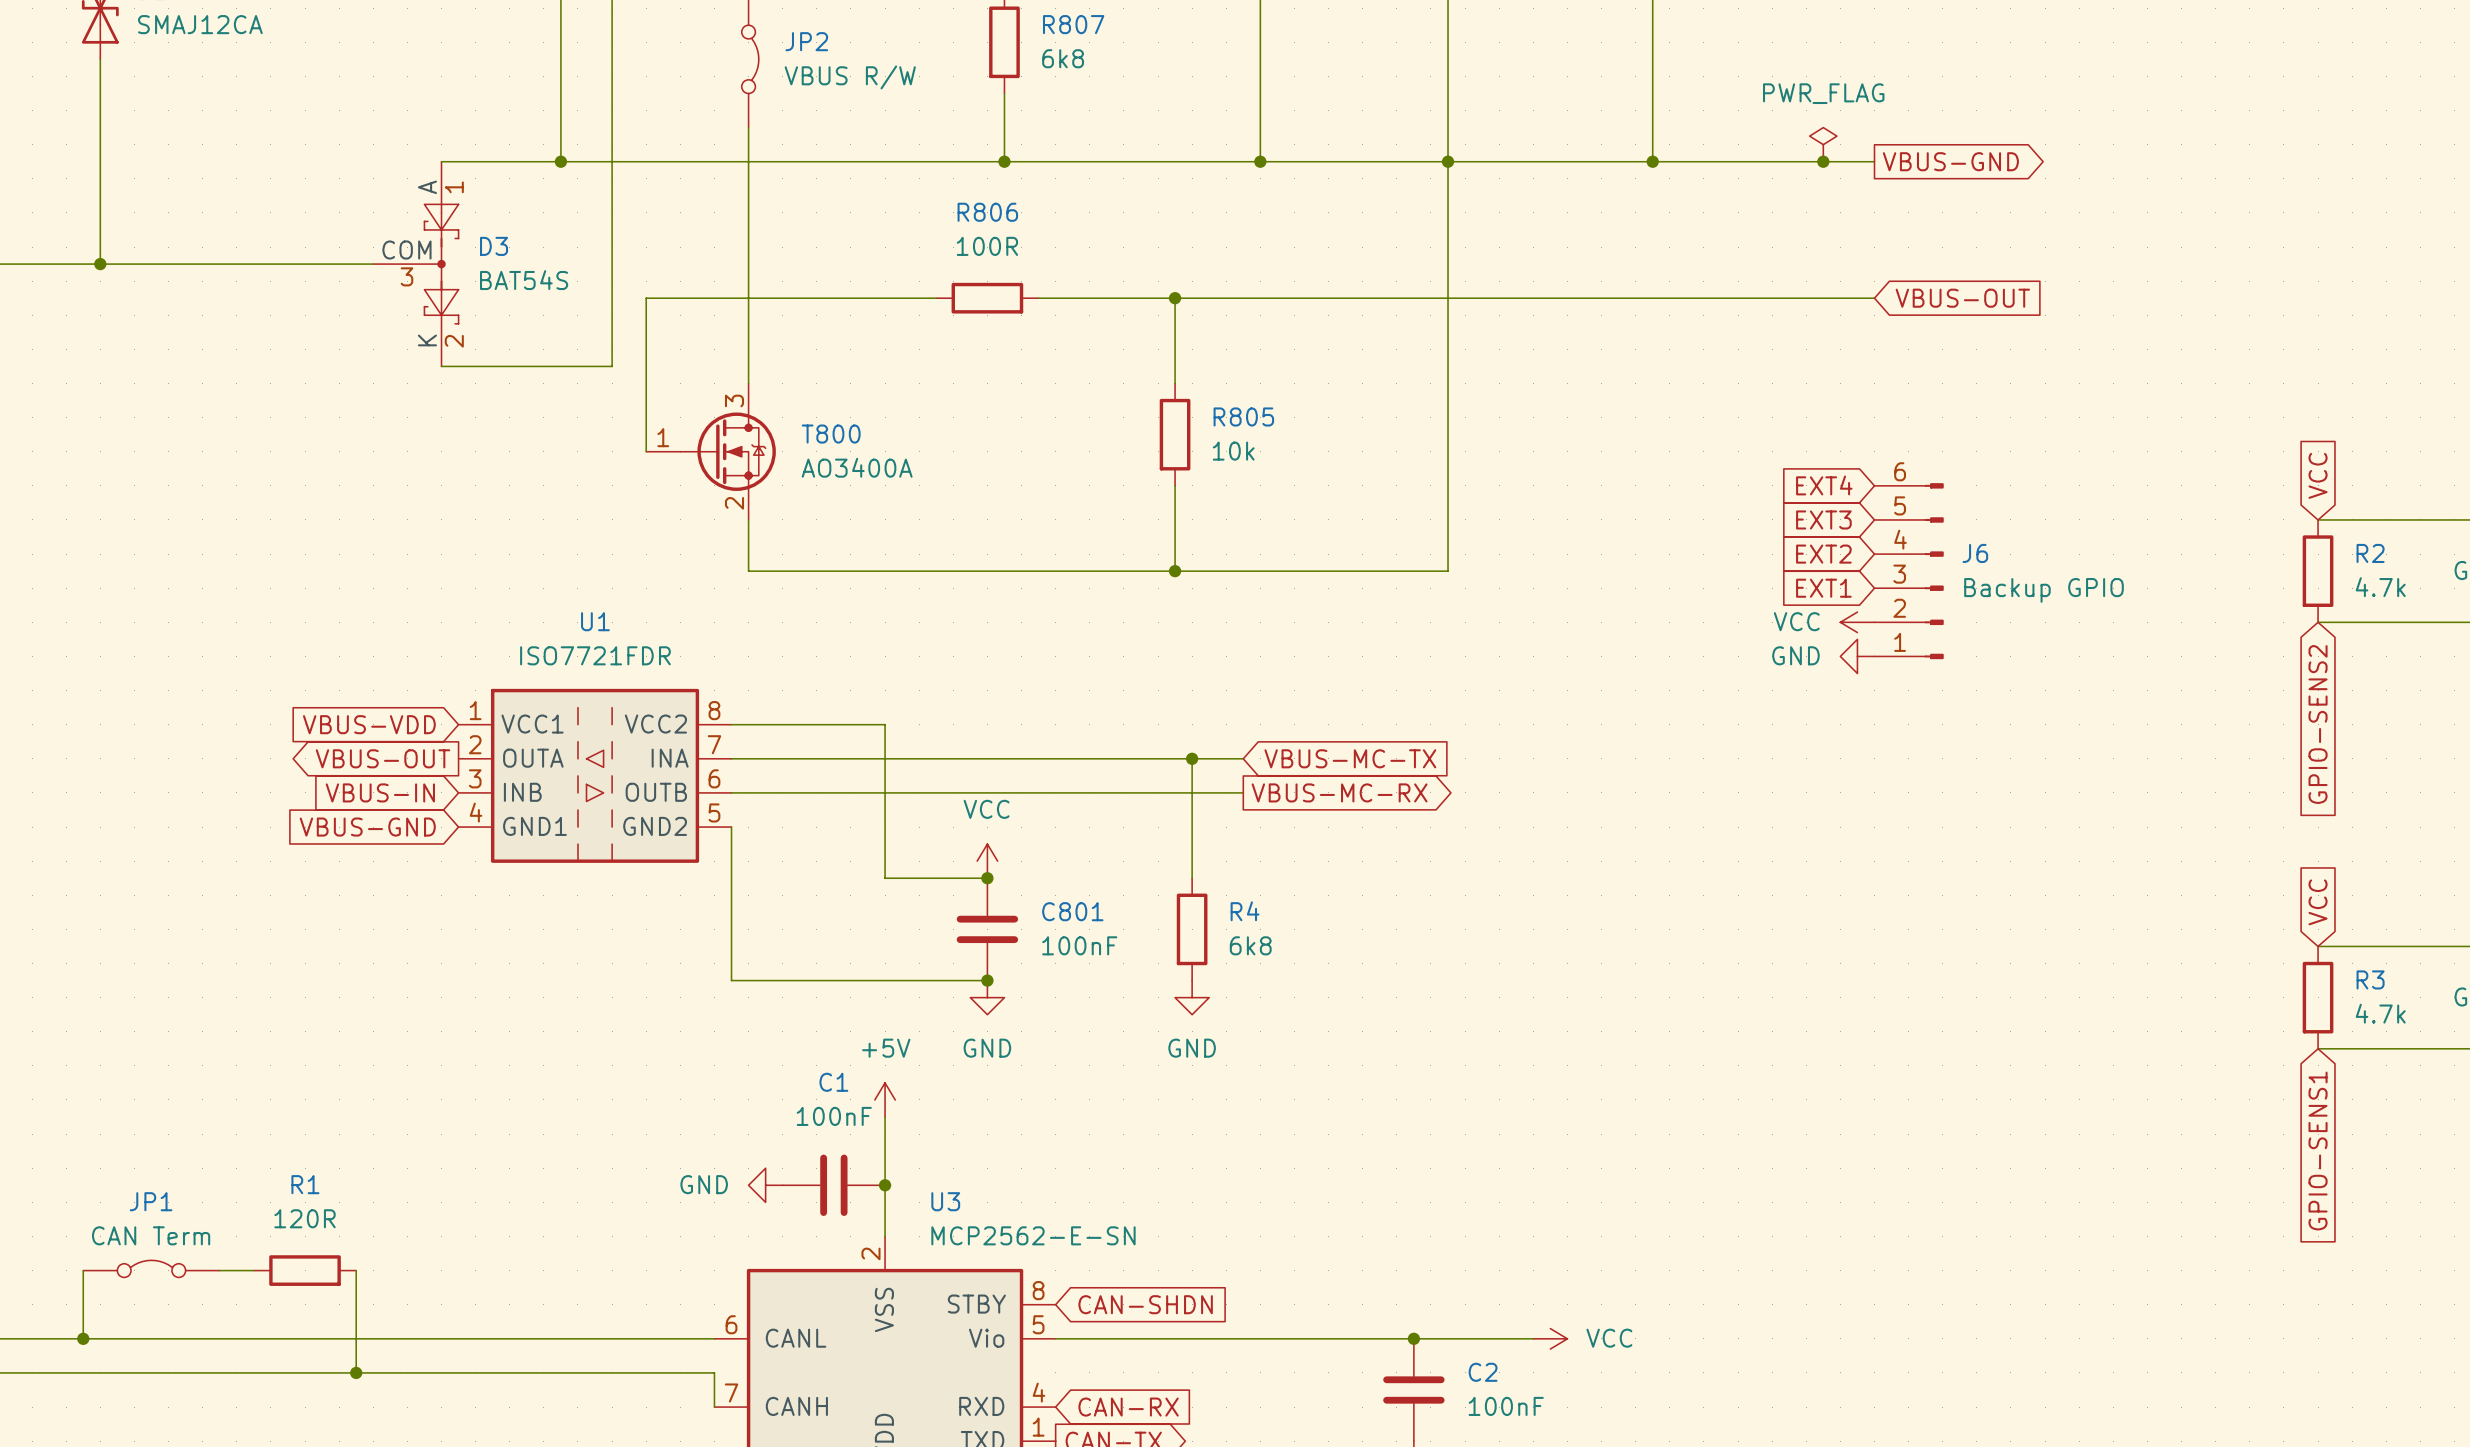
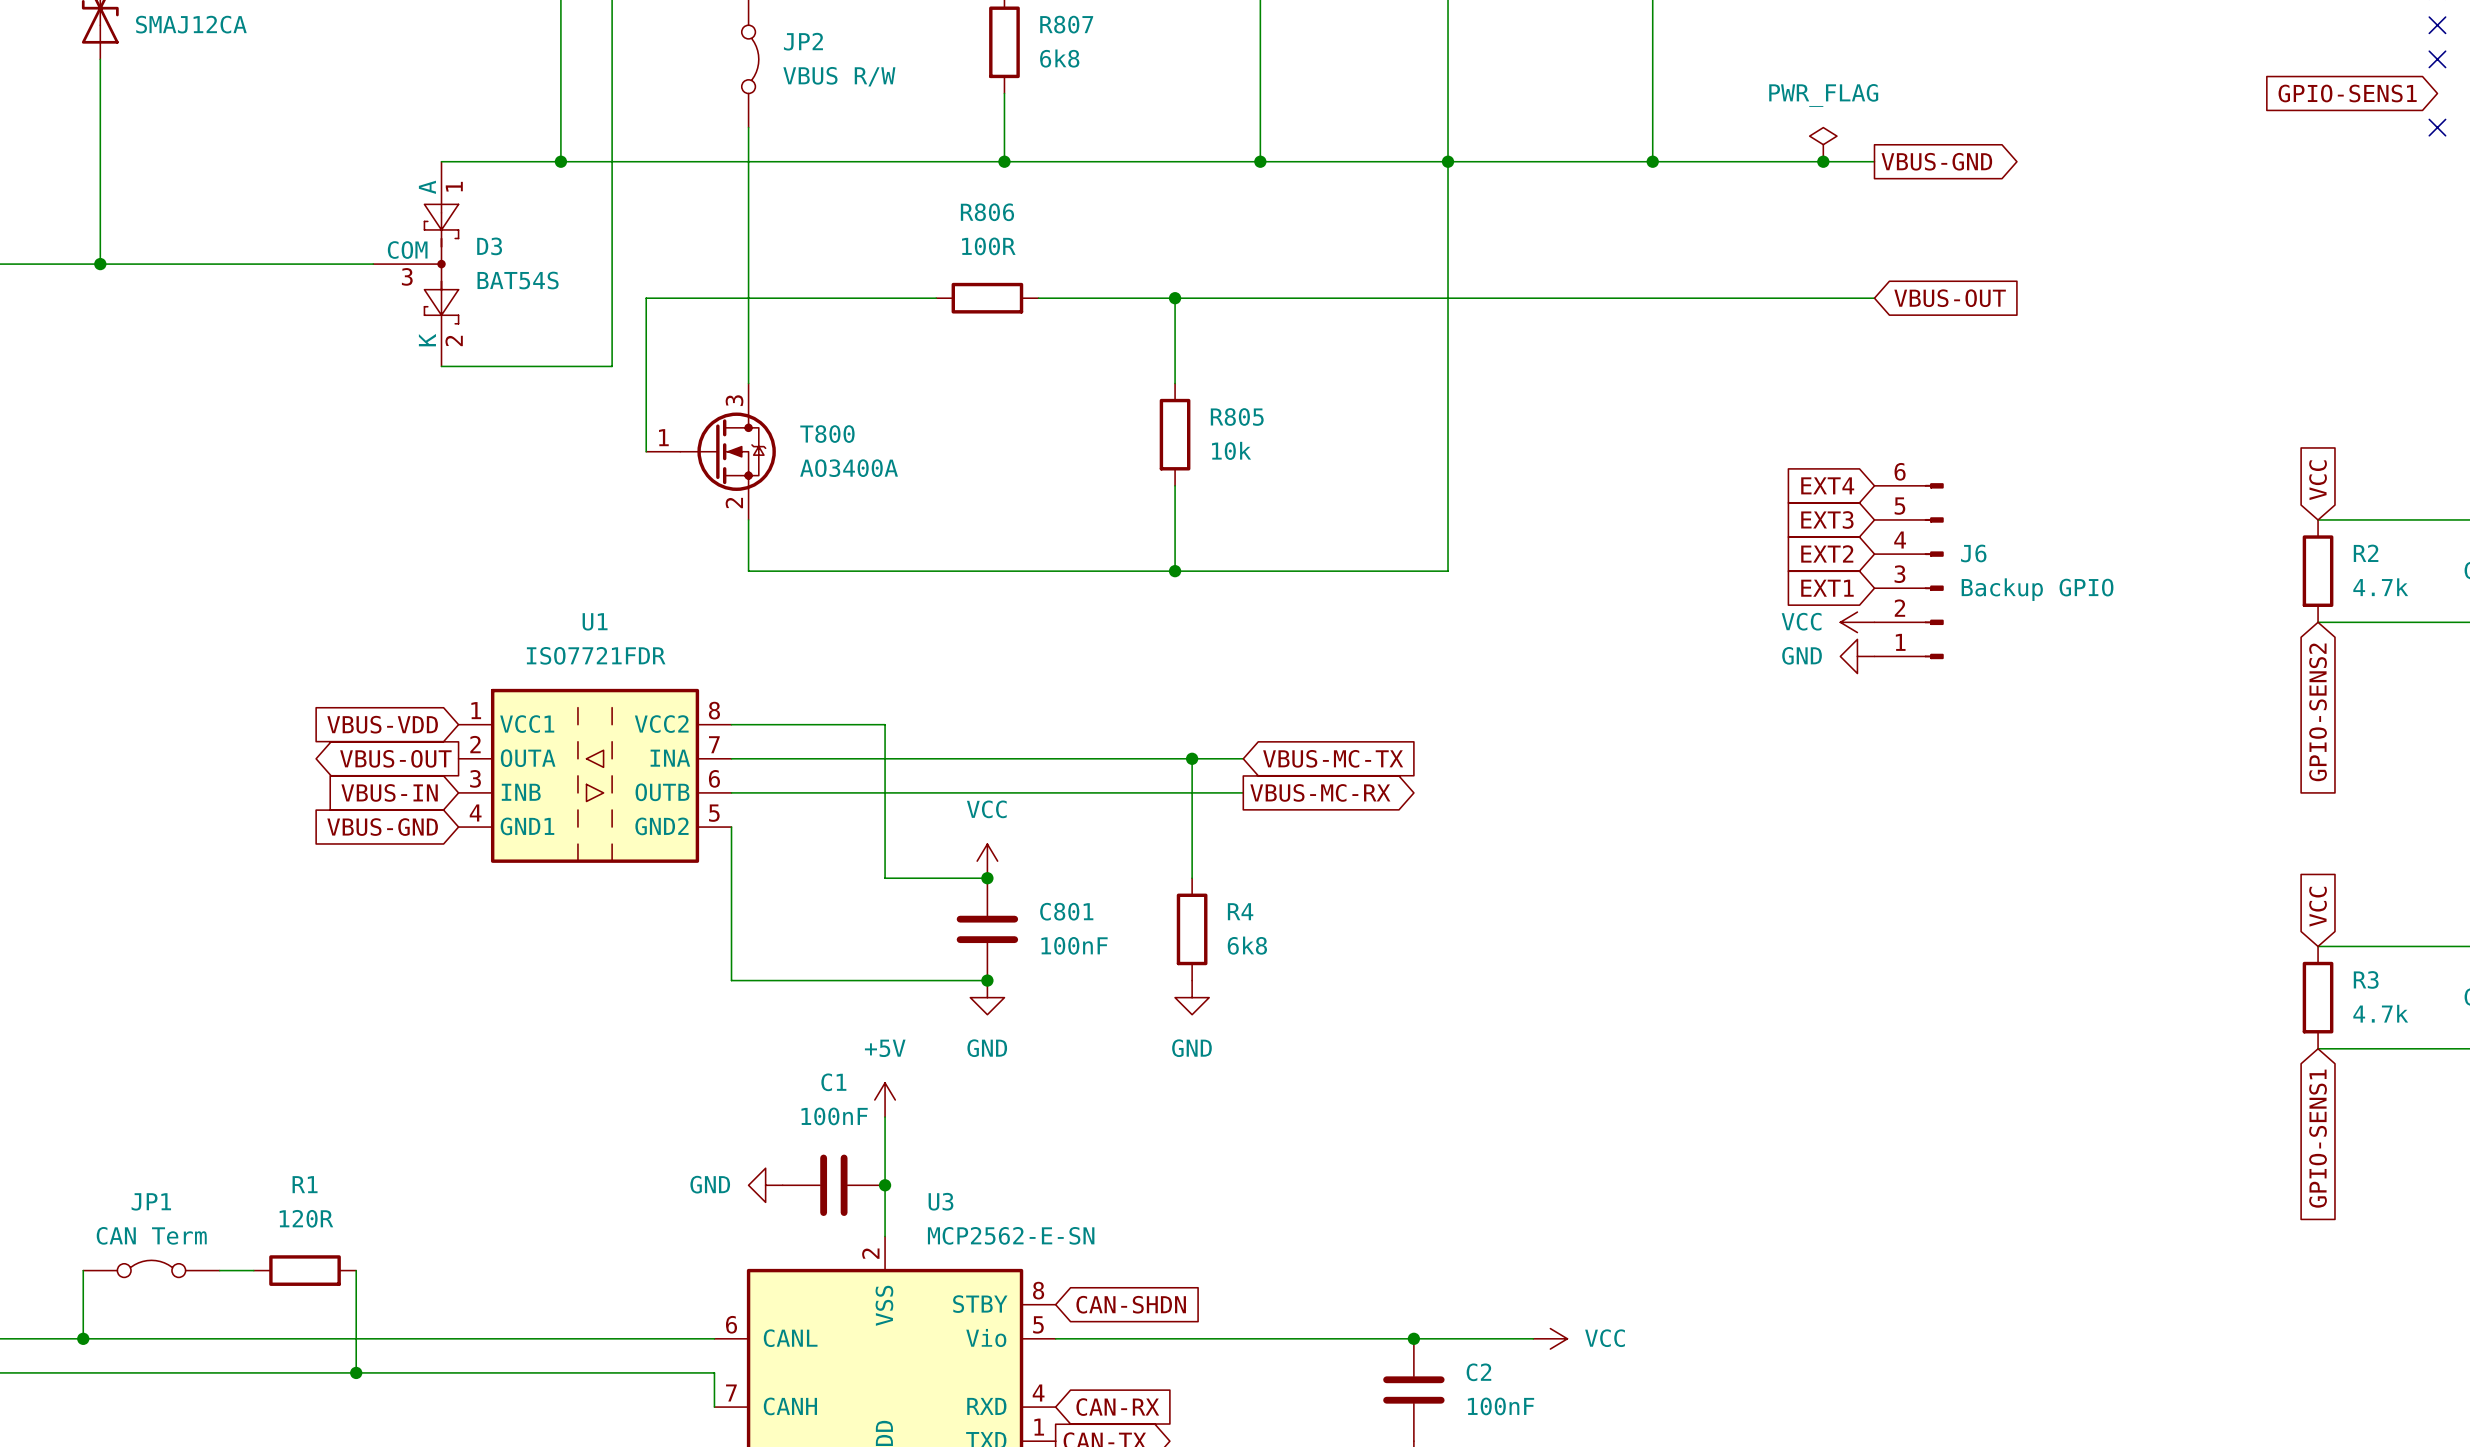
no-connect mark: none -> (2437, 25)
no-connect mark: none -> (2437, 59)
global label: none -> GPIO-SENS1 (2347, 93)
no-connect mark: none -> (2437, 127)

